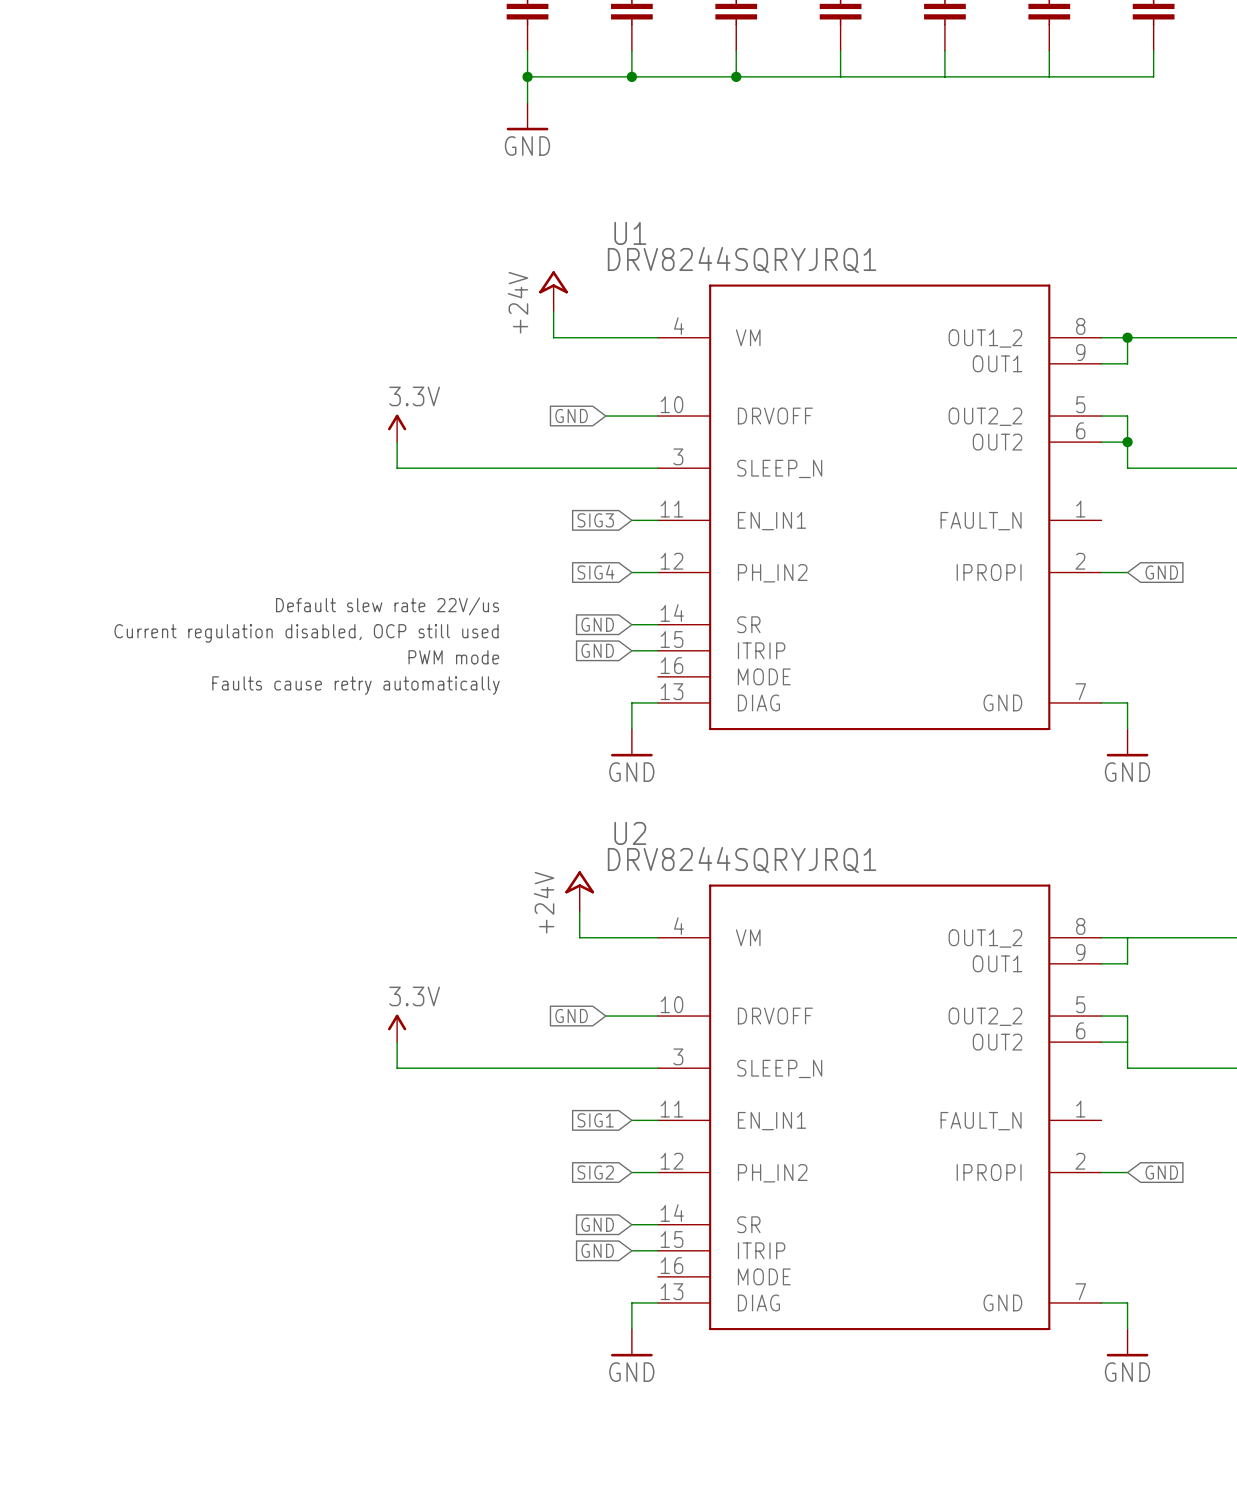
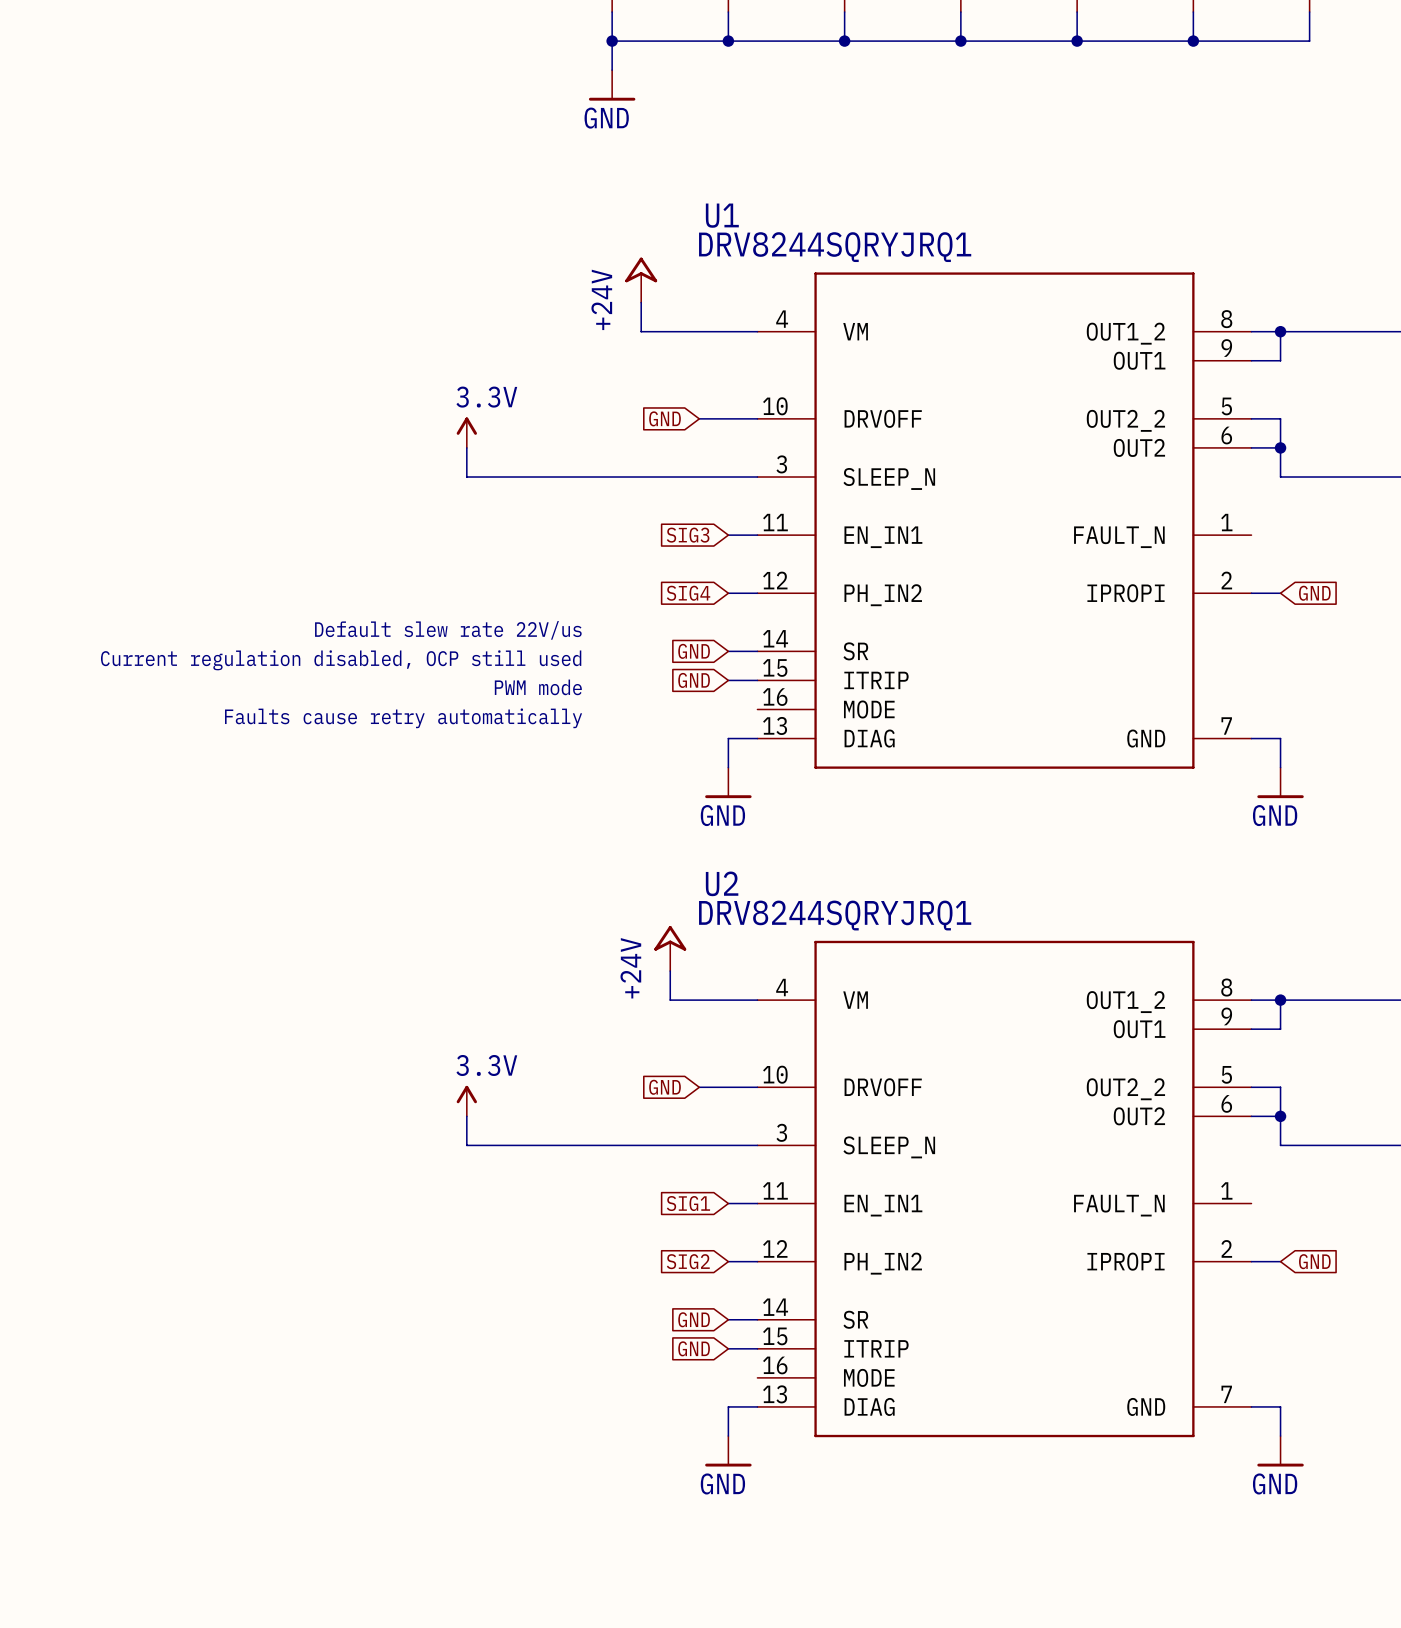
junction: none -> (960, 41)
junction: none -> (1077, 41)
junction: none -> (1193, 41)
junction: none -> (1280, 1000)
junction: none -> (1280, 1116)

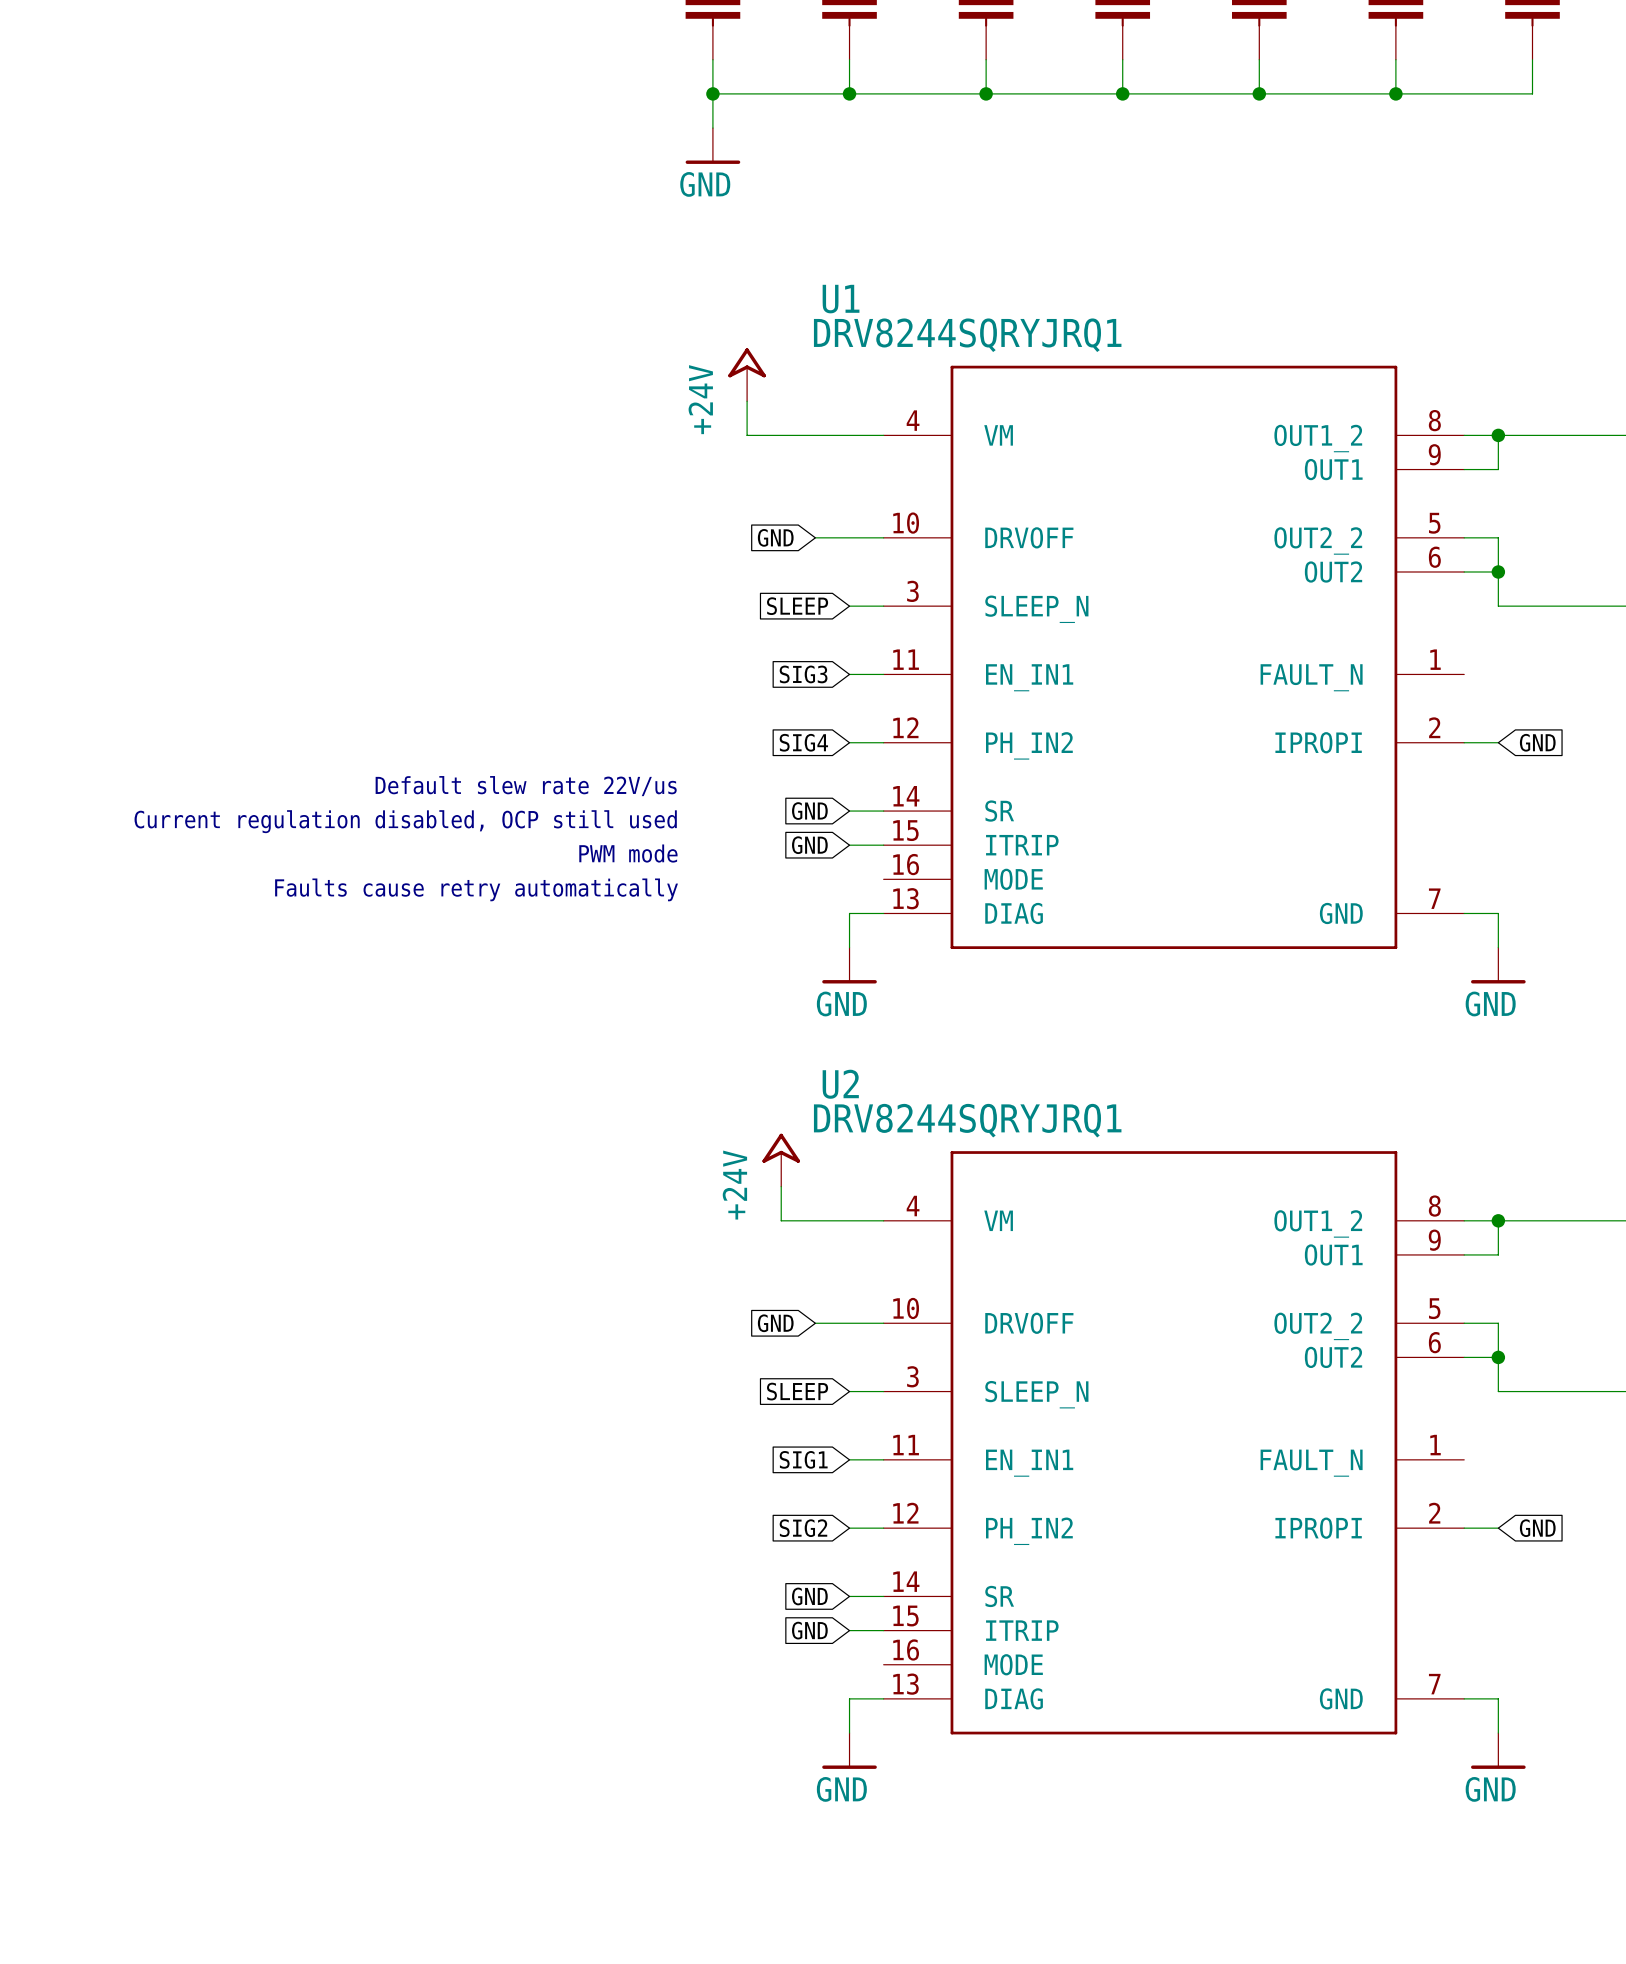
power symbol: 3.3V (466, 432) -> none
wire: (466, 447) (466, 477) (728, 477) -> none
global label: none -> SLEEP (797, 606)
power symbol: 3.3V (466, 1101) -> none
wire: (466, 1116) (466, 1145) (728, 1145) -> none
global label: none -> SLEEP (797, 1391)

